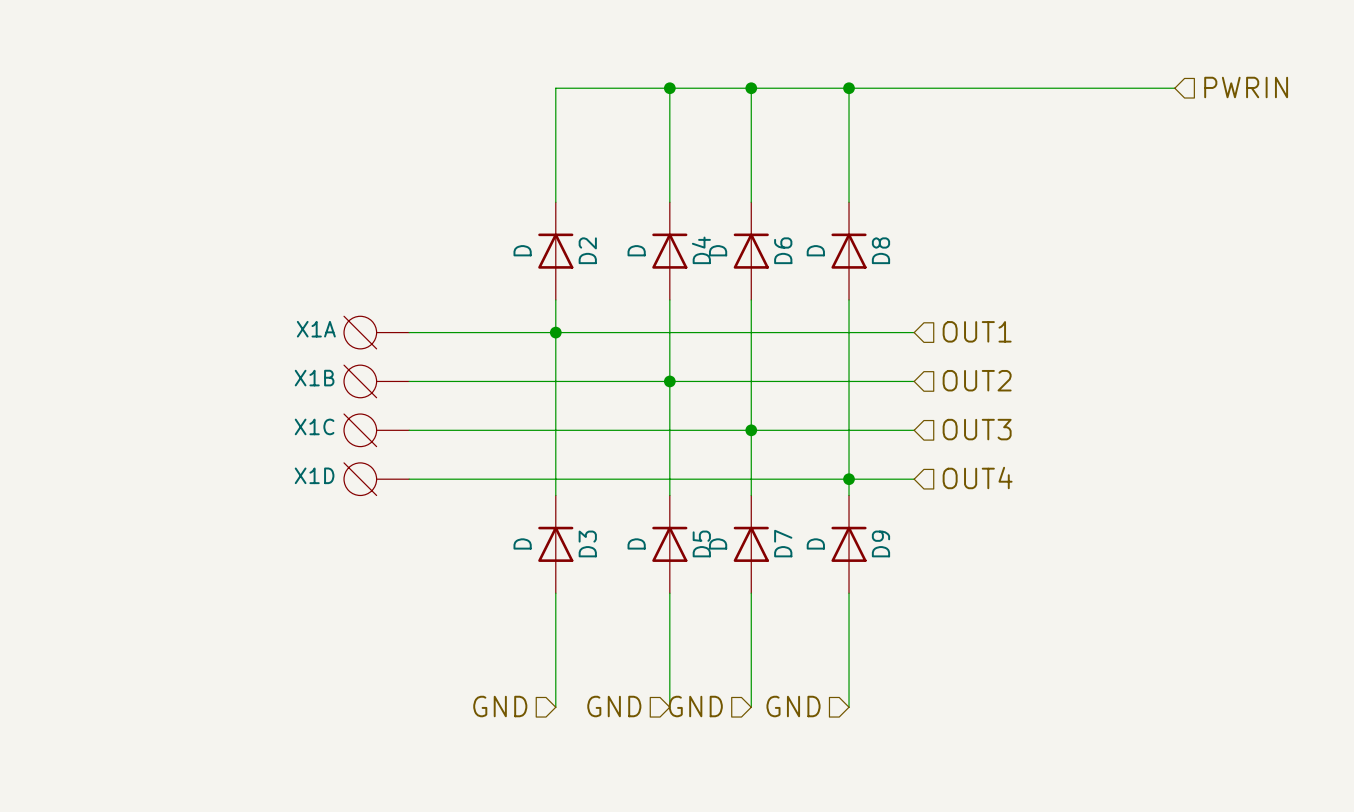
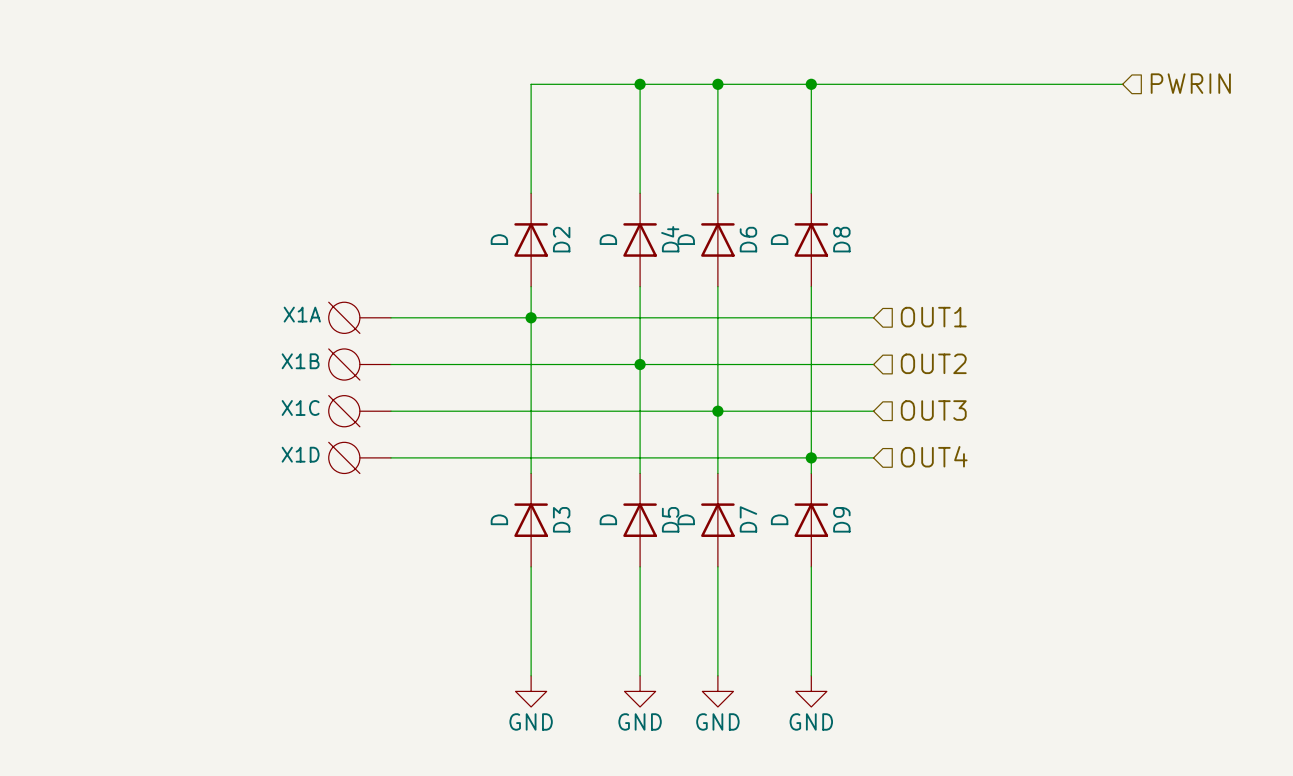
hierarchical label: GND (500, 706) -> none
hierarchical label: GND (614, 706) -> none
hierarchical label: GND (695, 706) -> none
hierarchical label: GND (793, 706) -> none
power symbol: none -> GND (531, 691)
power symbol: none -> GND (640, 691)
power symbol: none -> GND (717, 691)
power symbol: none -> GND (811, 691)

